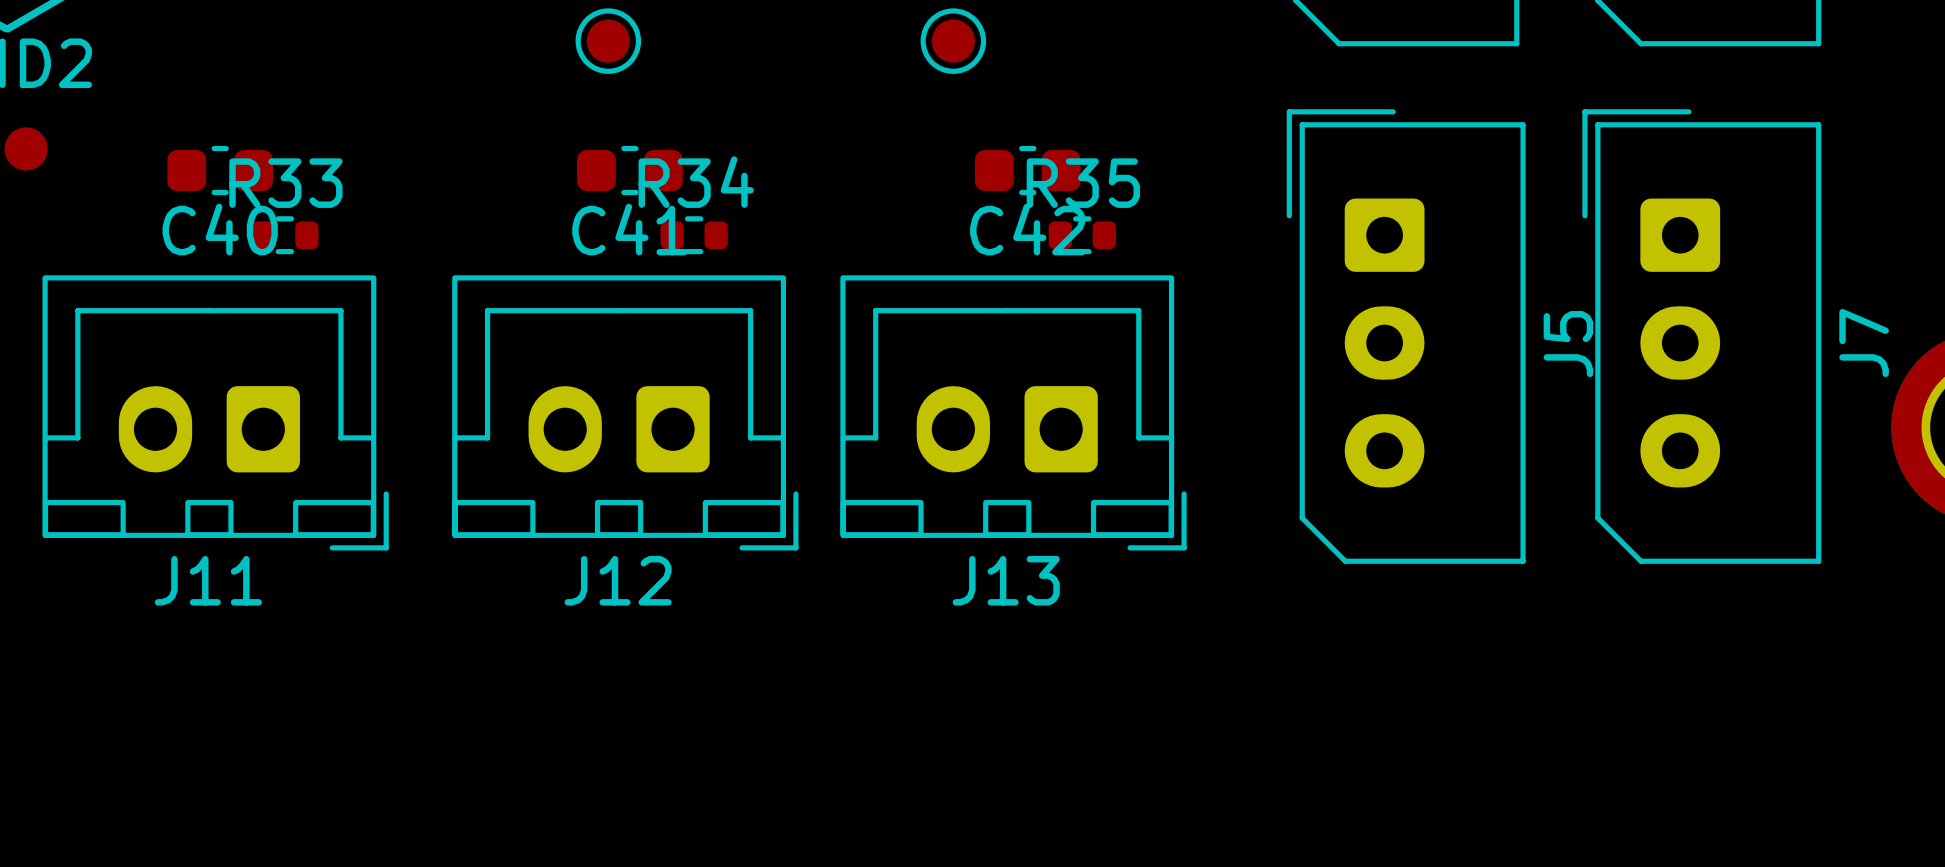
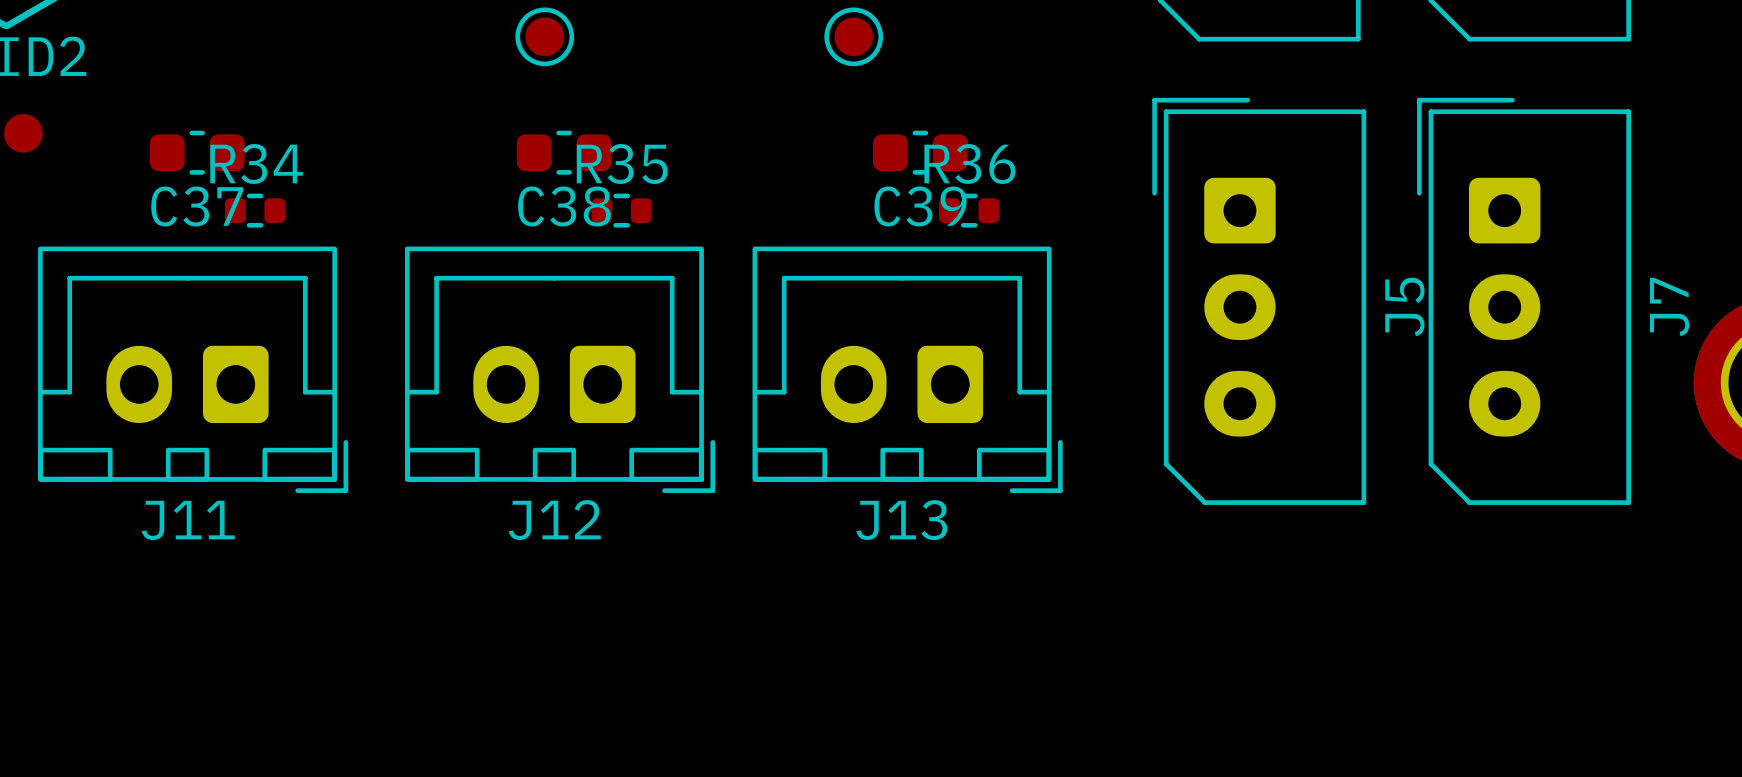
R34 name: R34 (696, 182) -> R35 (622, 163)
R33 name: R33 (285, 183) -> R34 (256, 163)
R35 name: R35 (1083, 183) -> R36 (969, 163)
C40 name: C40 (220, 229) -> C37 (197, 206)
C41 name: C41 (629, 229) -> C38 (564, 206)
C42 name: C42 (1027, 229) -> C39 (920, 206)

